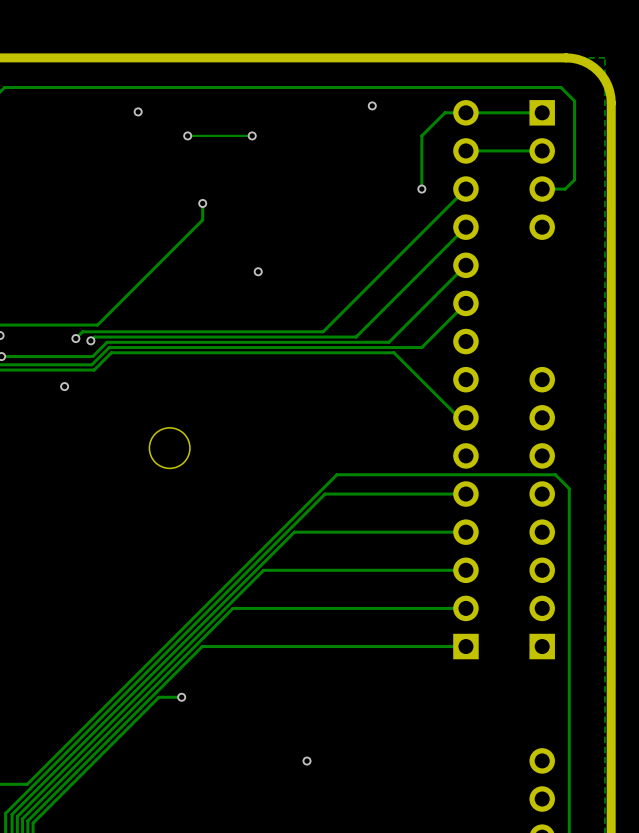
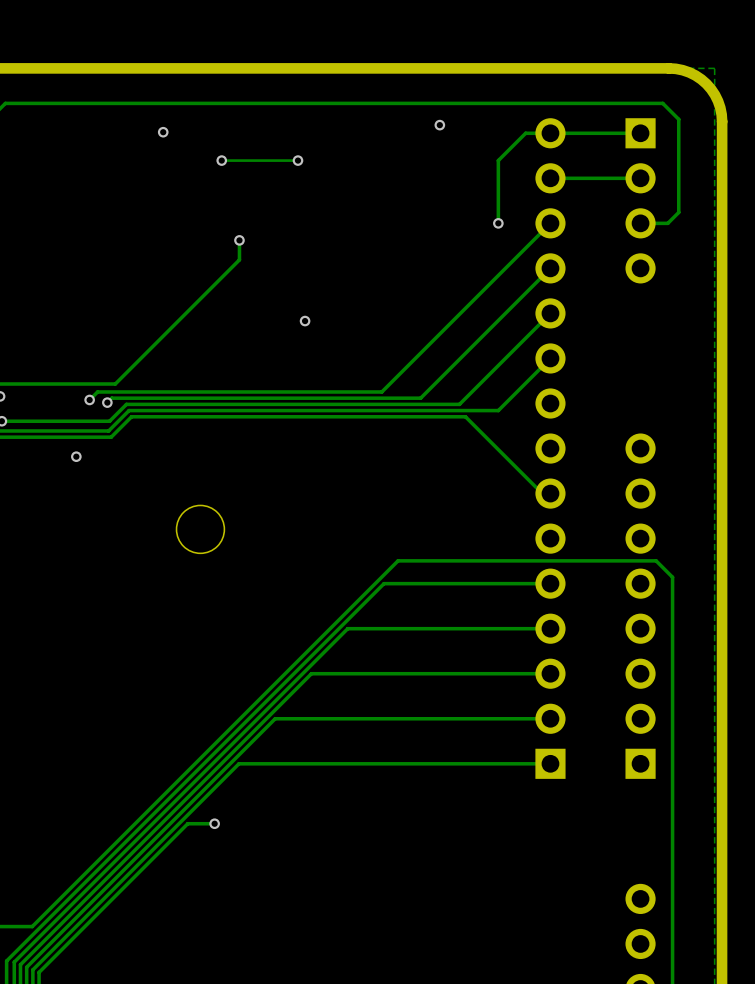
via: (307, 761) -> none

